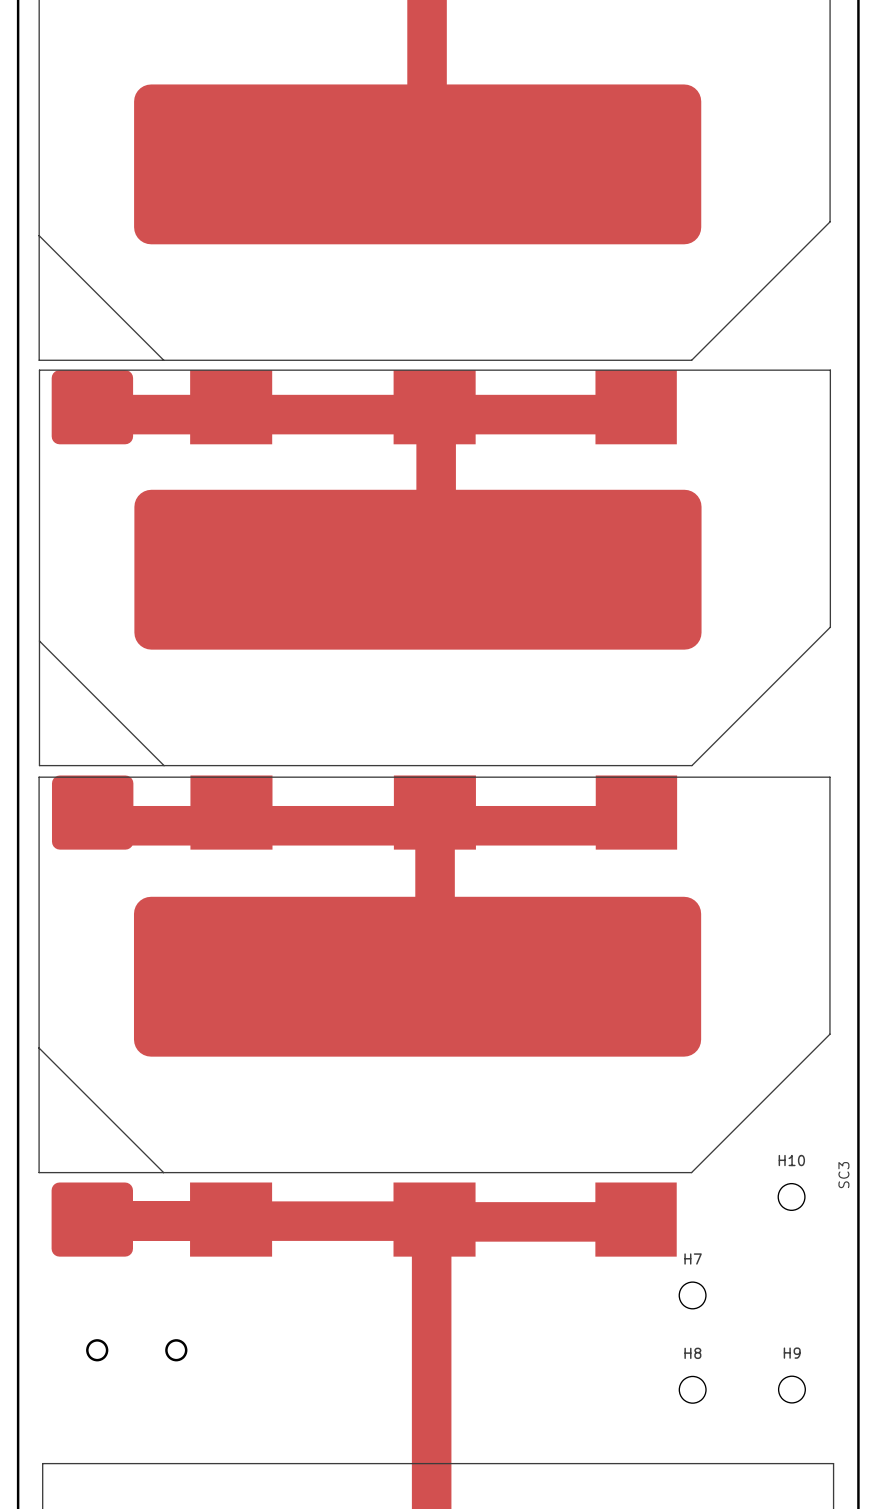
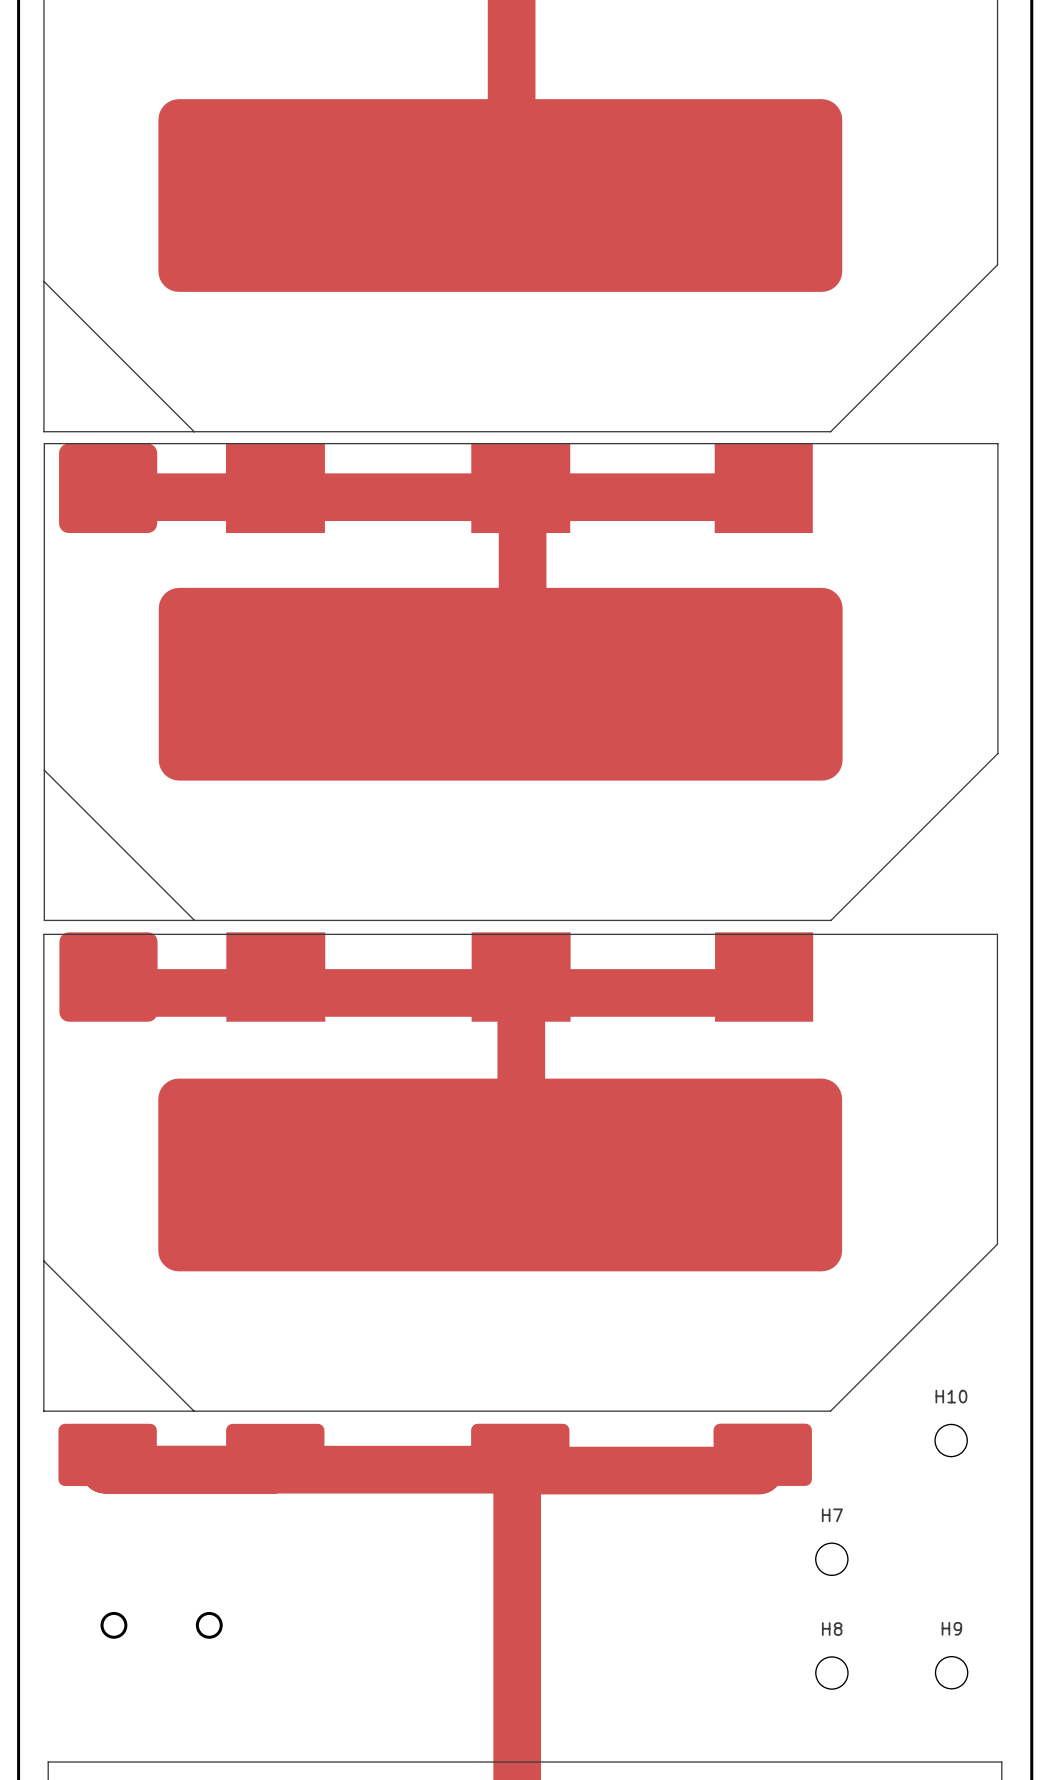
part: none -> (520, 1209)
SC3: (434, 1016) -> none

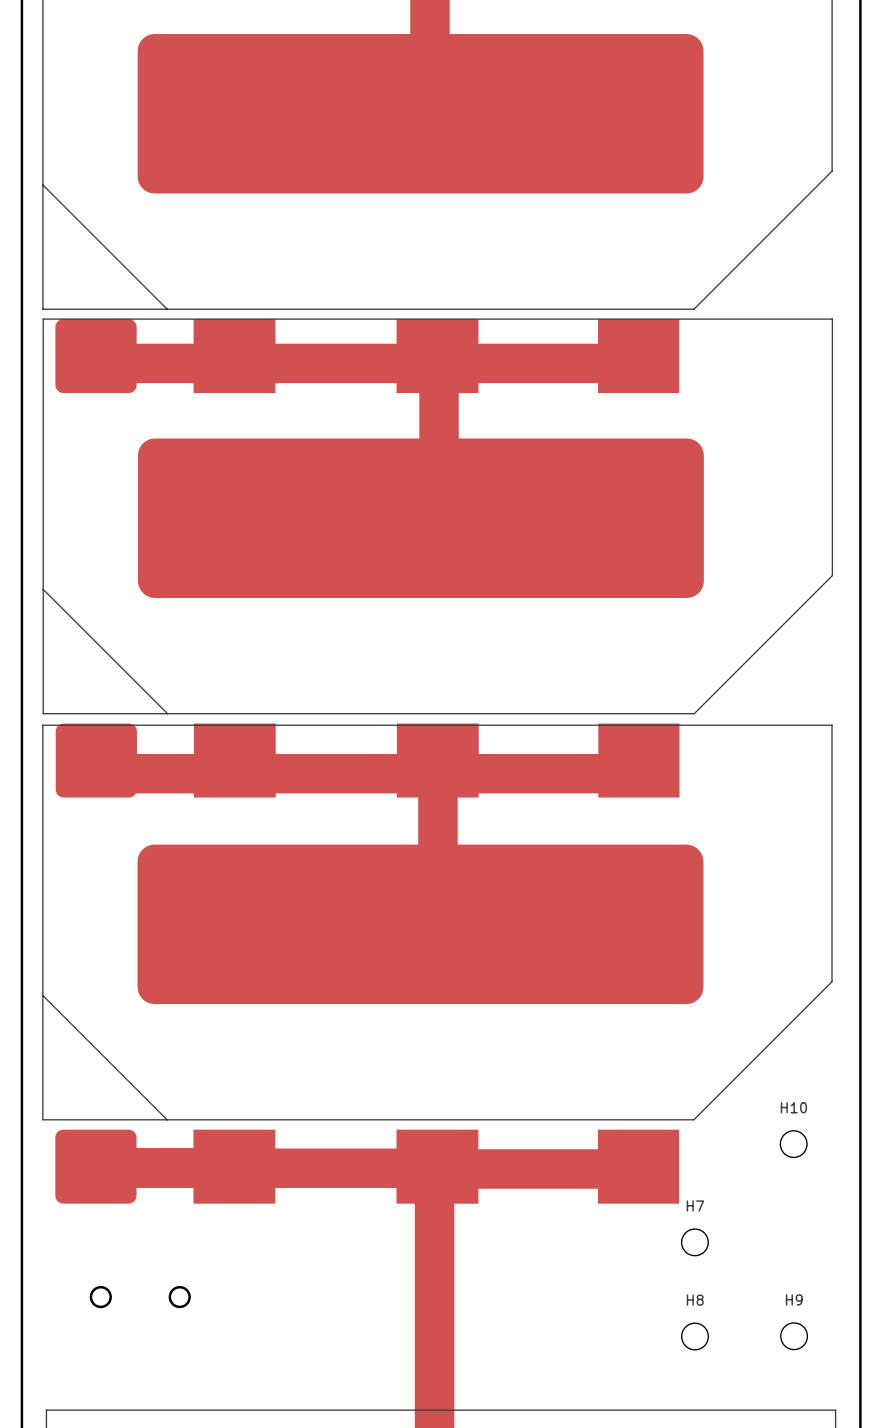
part: (520, 1209) -> none
part: none -> (437, 964)

